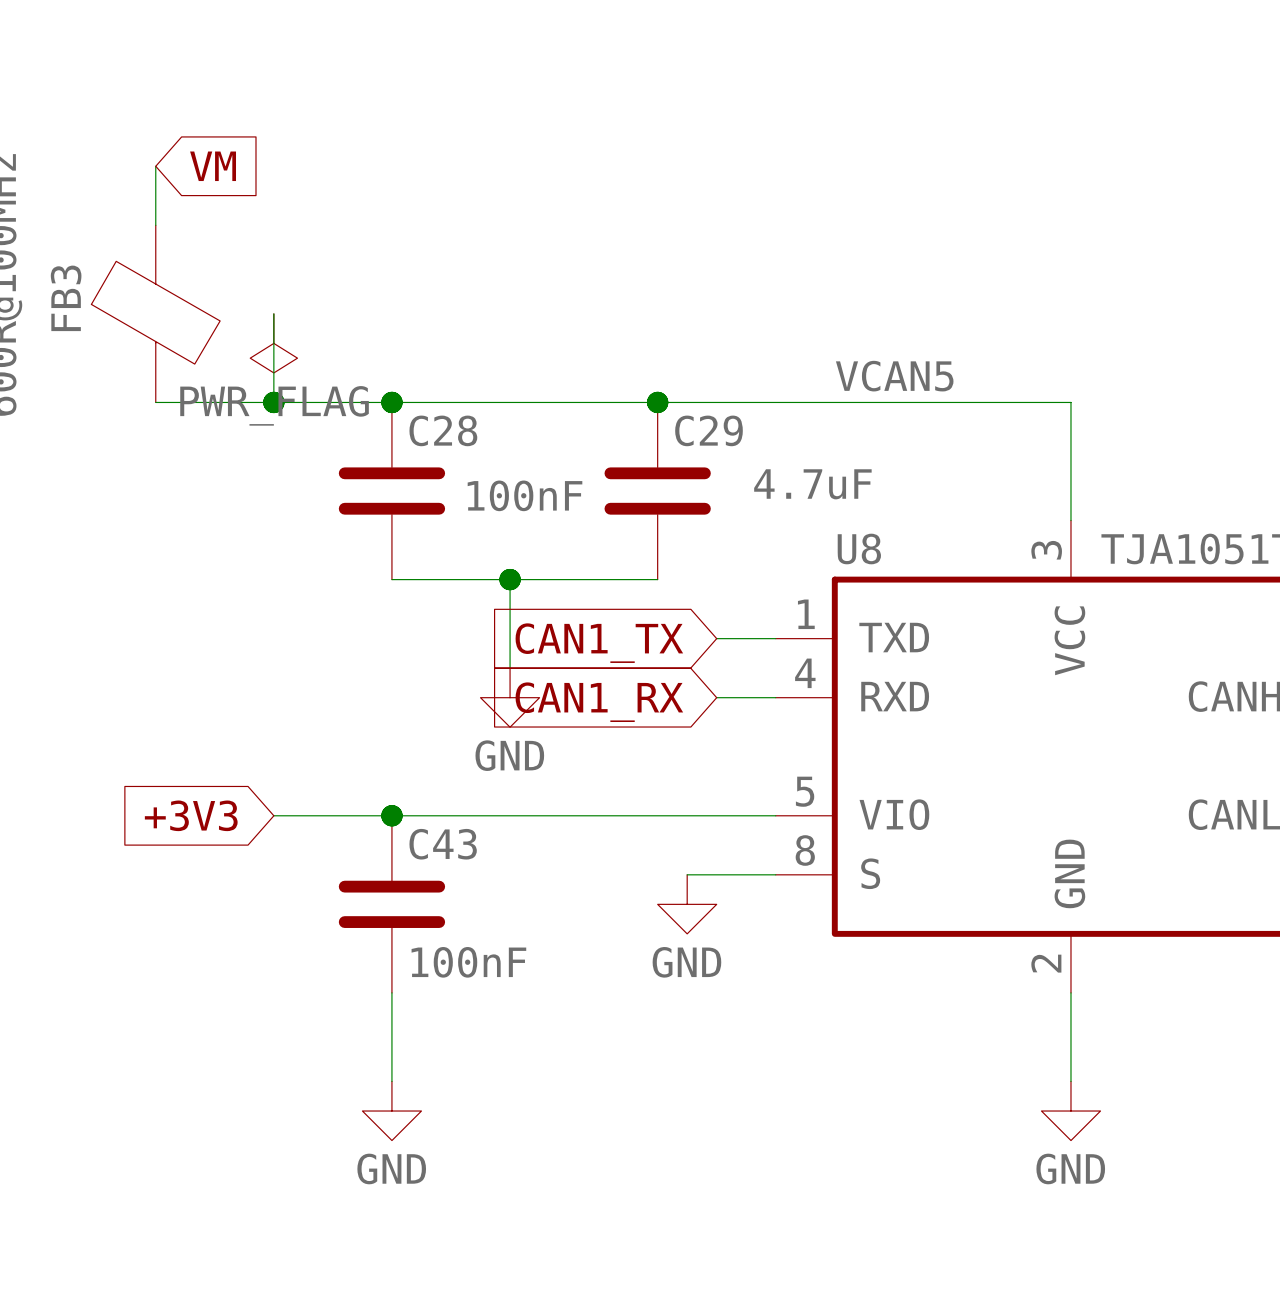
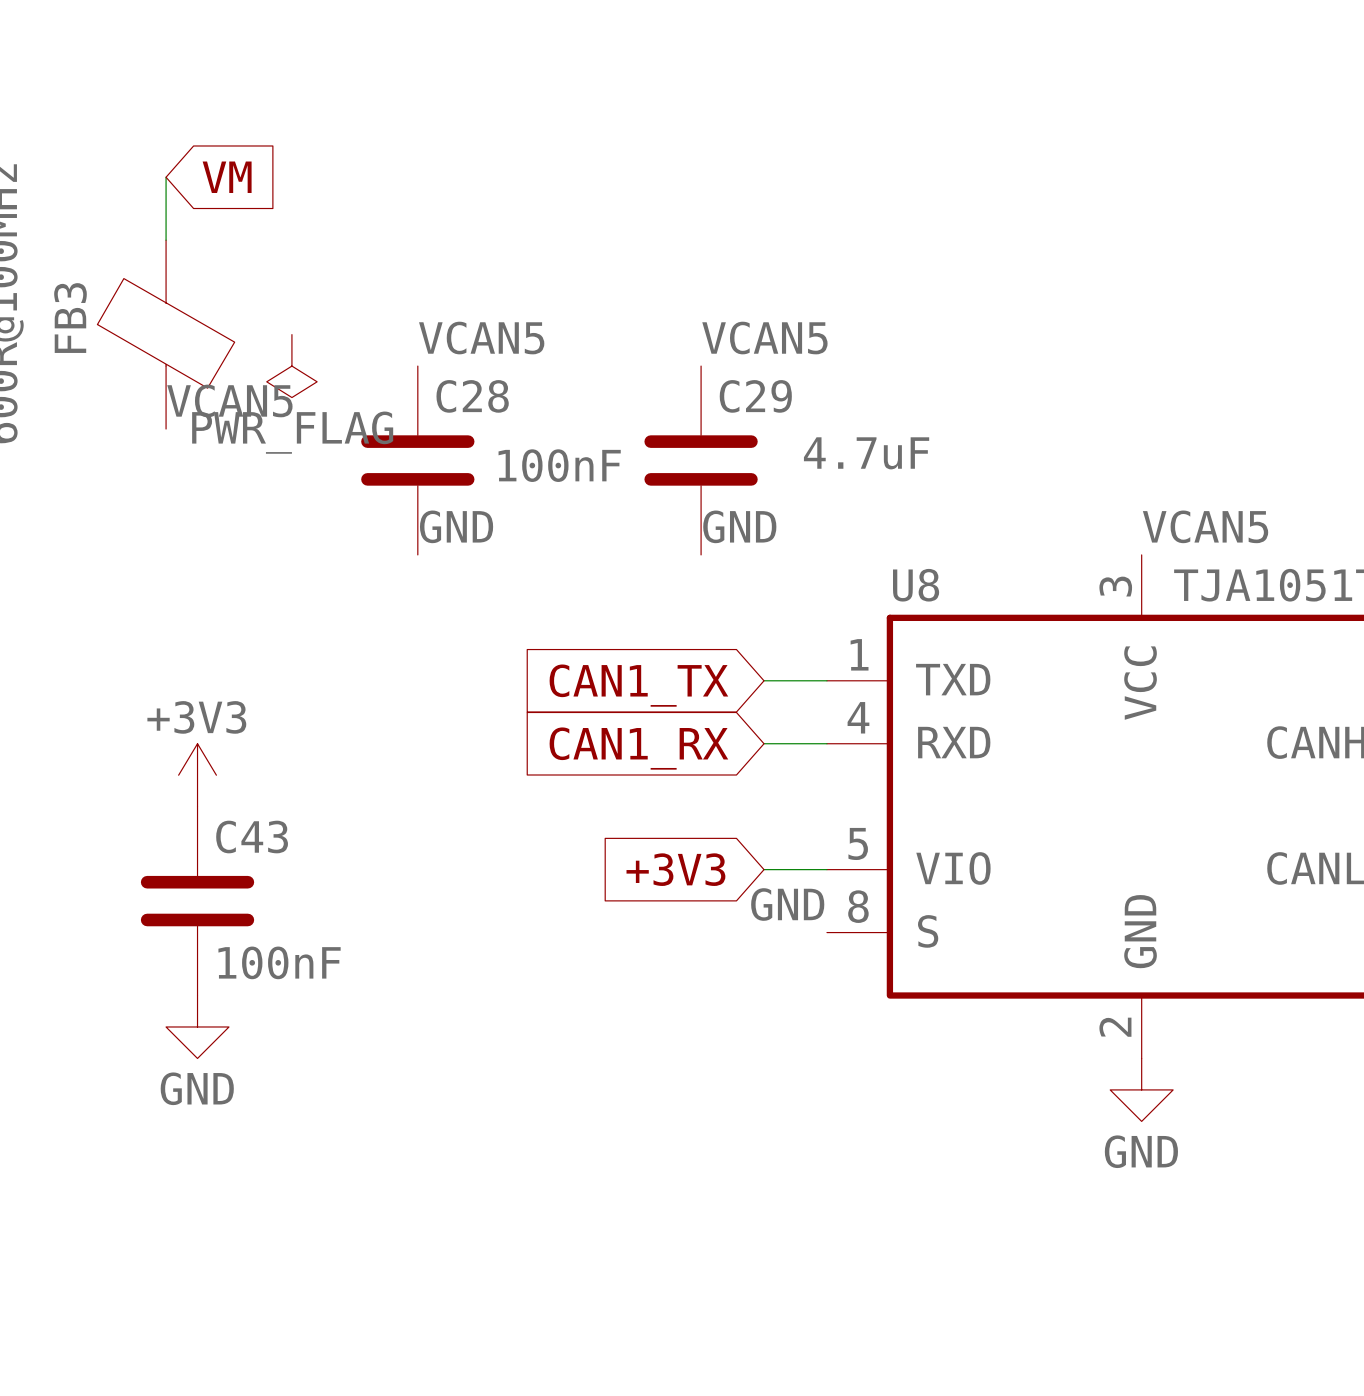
wire: (273, 313) (273, 402) -> none
label: none -> VCAN5 (481, 338)
label: none -> VCAN5 (764, 338)
label: none -> VCAN5 (229, 400)
label: VCAN5 (894, 376) -> none
wire: (155, 402) (1070, 402) (1070, 520) -> none
junction: (273, 402) -> none
junction: (391, 402) -> none
junction: (657, 402) -> none
C28 position: (391, 491) -> (417, 460)
C29 position: (657, 491) -> (701, 460)
label: none -> GND (456, 526)
label: none -> GND (739, 526)
label: none -> VCAN5 (1205, 526)
wire: (391, 579) (657, 579) -> none
wire: (510, 579) (510, 668) -> none
junction: (510, 579) -> none
power symbol: GND (510, 697) -> none
power symbol: none -> +3V3 (197, 775)
global label position: +3V3 (191, 815) -> +3V3 (675, 869)
wire: (273, 815) (716, 815) -> none
junction: (391, 815) -> none
label: none -> GND (787, 904)
wire: (687, 874) (775, 874) -> none
C43 position: (391, 904) -> (197, 901)
power symbol: GND (687, 904) -> none
power symbol: none -> GND (197, 1026)
wire: (391, 992) (391, 1081) -> none
wire: (1070, 992) (1070, 1081) -> none
power symbol: GND (391, 1111) -> none
power symbol position: GND (1070, 1111) -> GND (1141, 1089)

